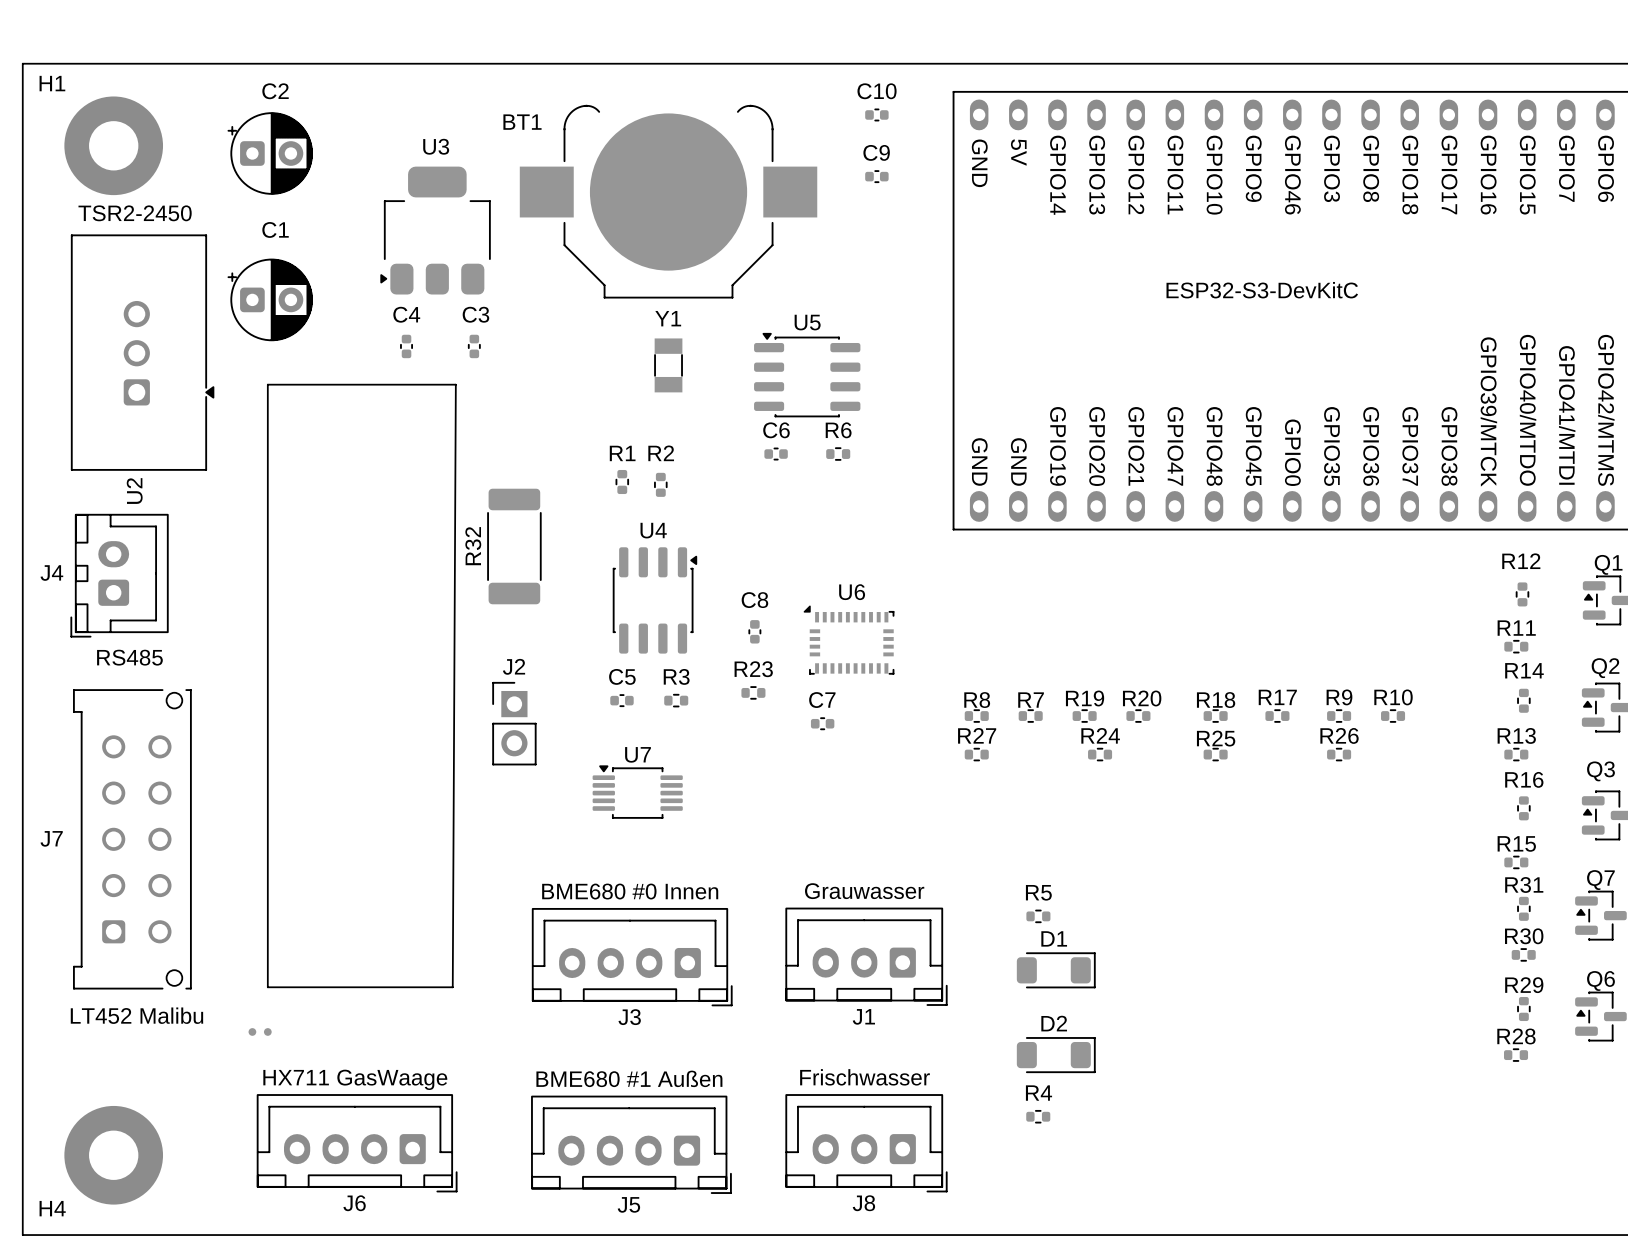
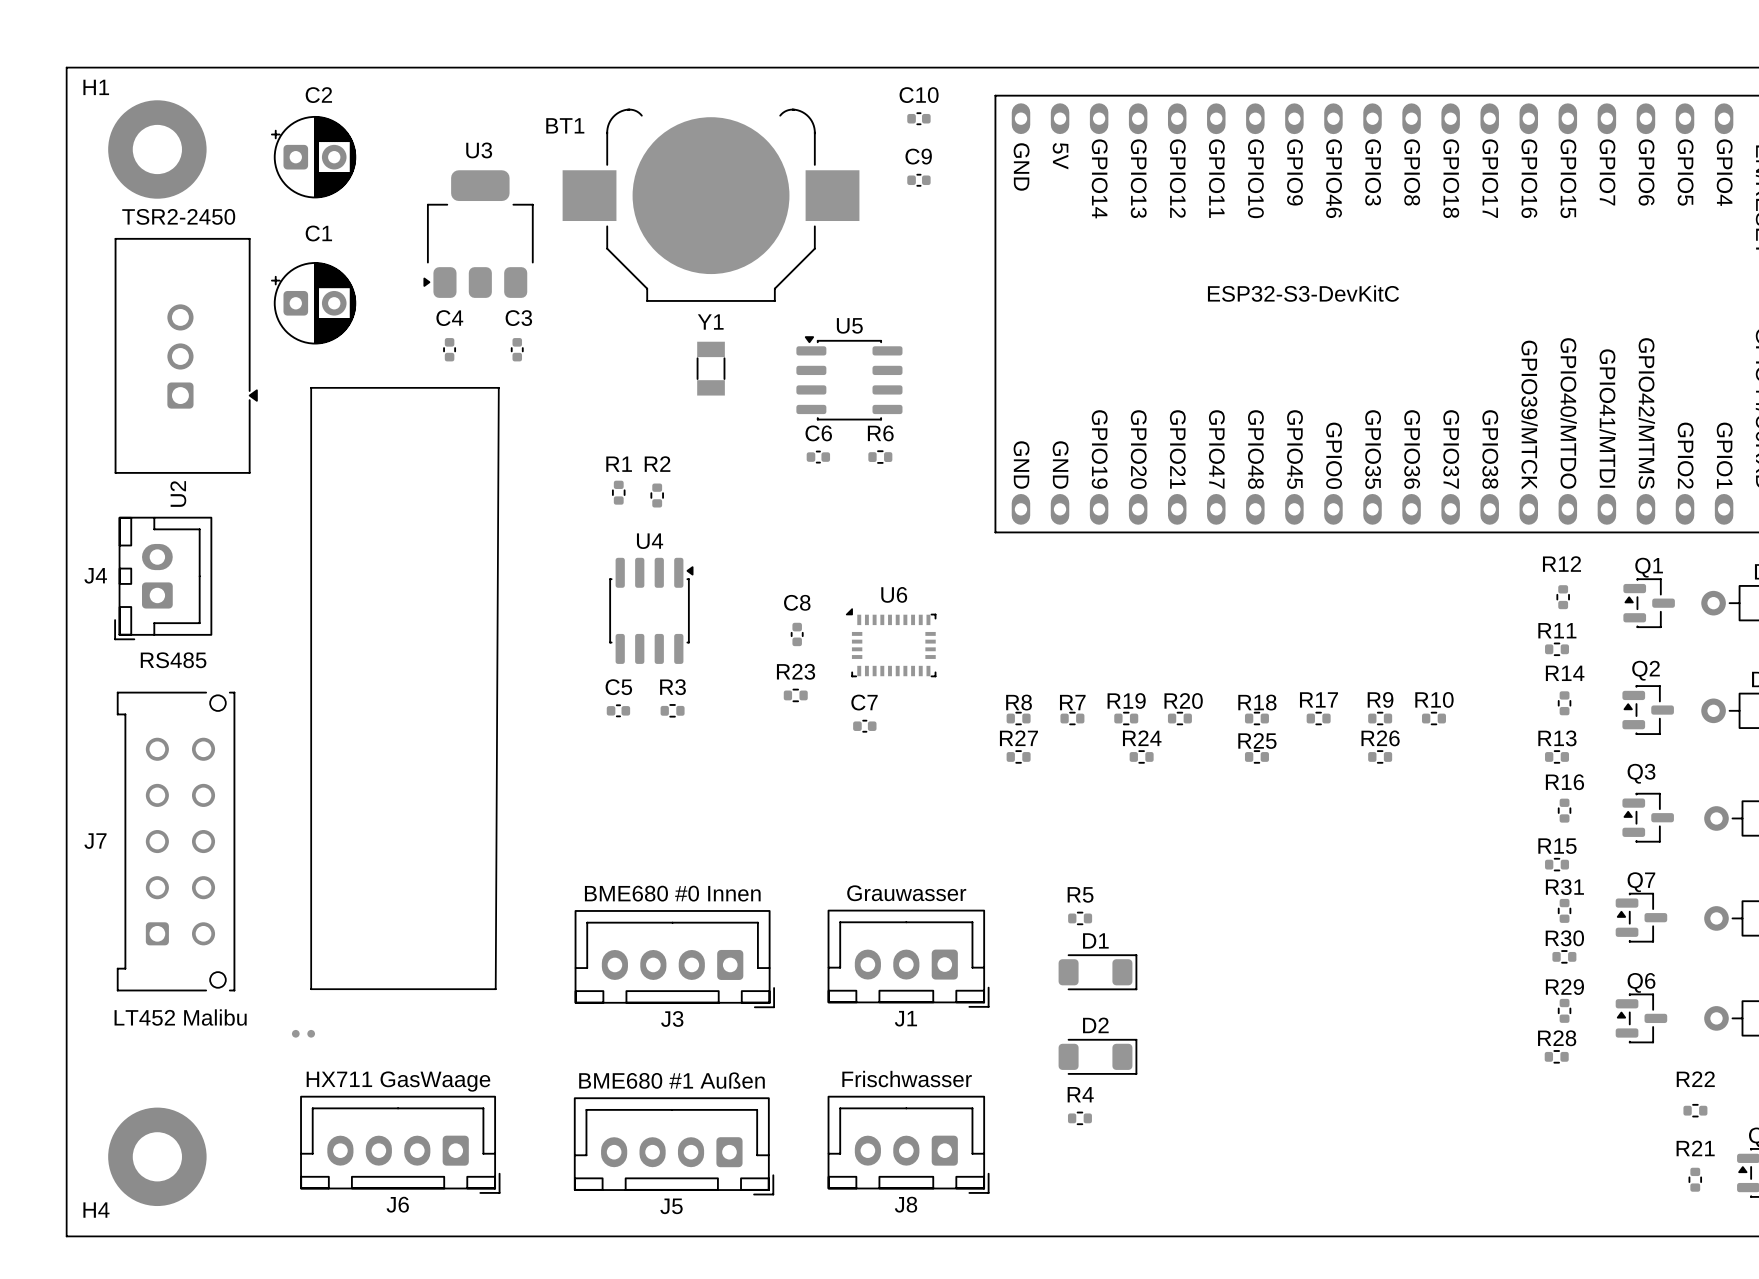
R1 position: (622, 482) -> (618, 492)
R2 position: (660, 484) -> (657, 495)
R32: (514, 546) -> none
U4 position: (654, 600) -> (651, 610)
C5 position: (621, 700) -> (618, 710)
R3 position: (676, 700) -> (672, 710)
J2: (514, 723) -> none
U7: (637, 792) -> none

